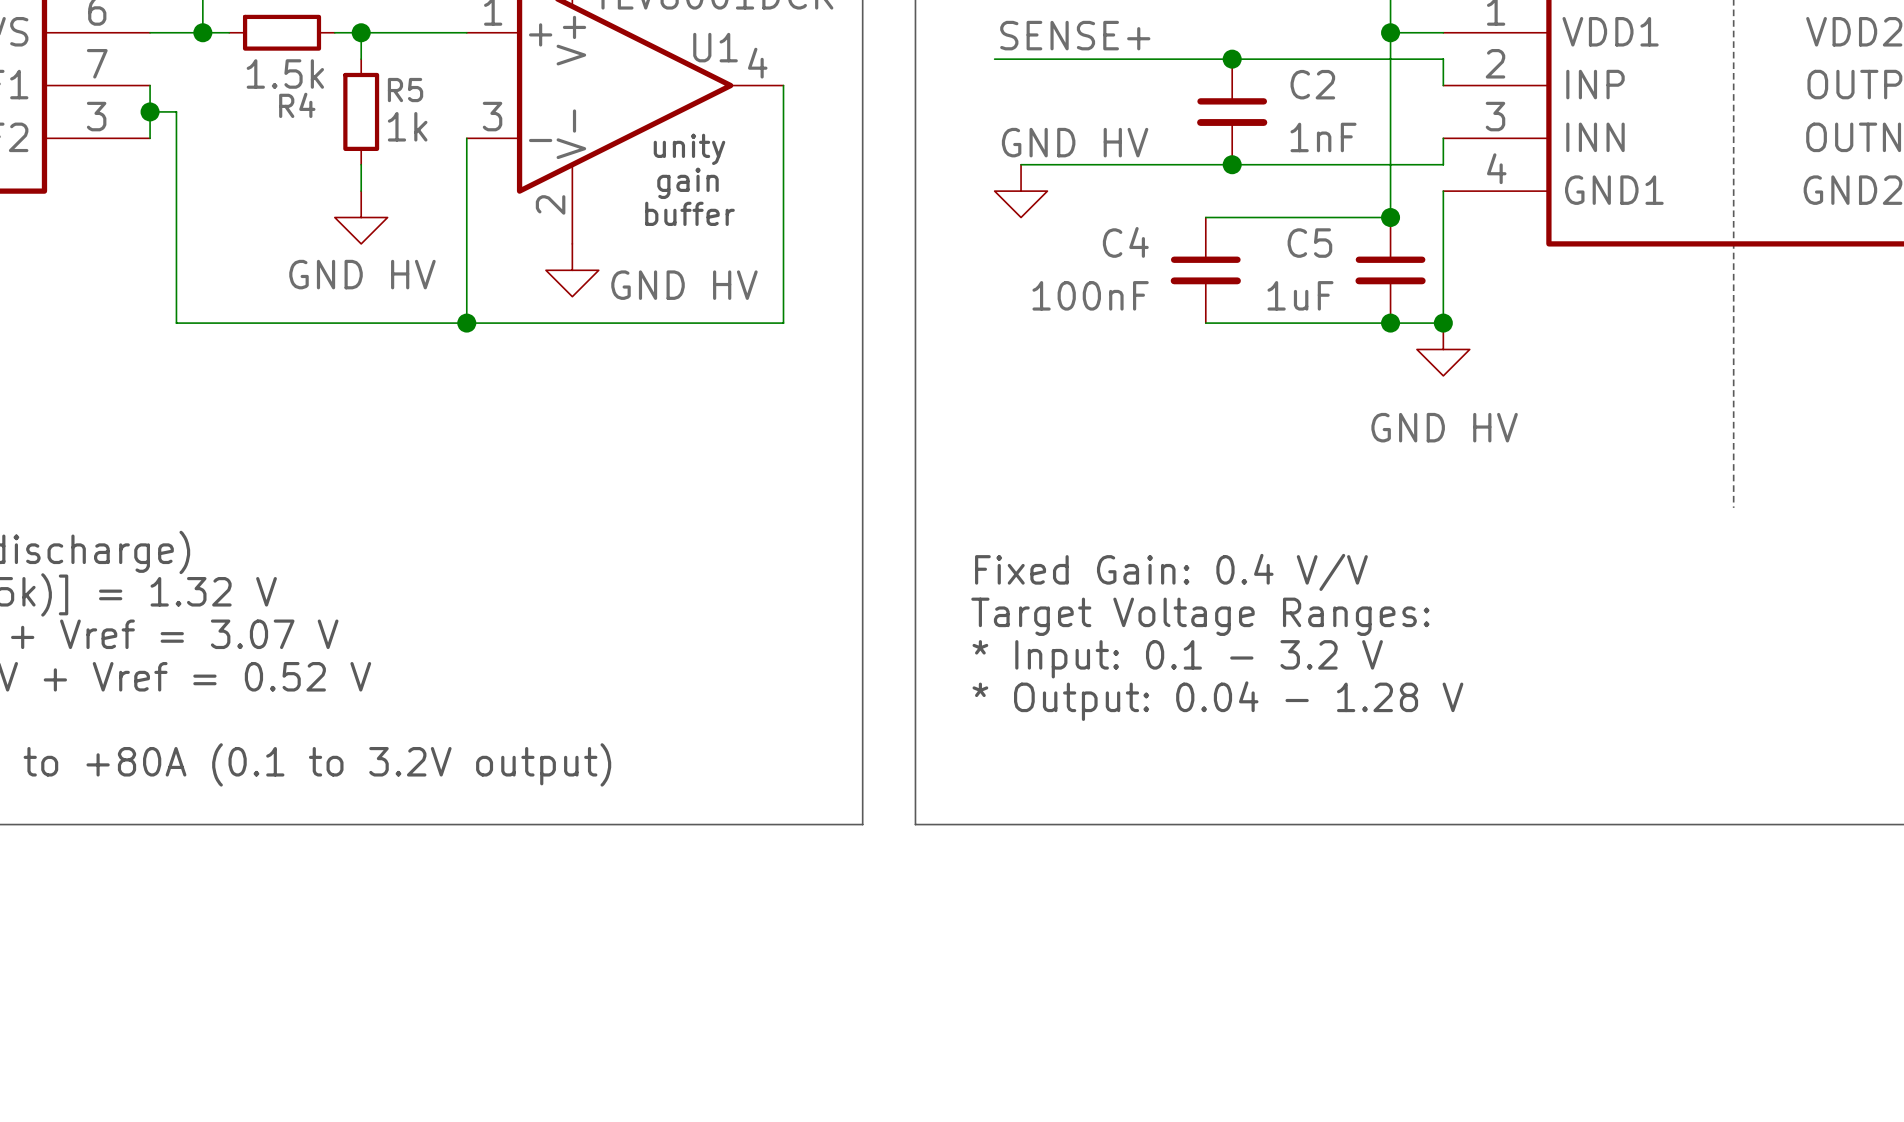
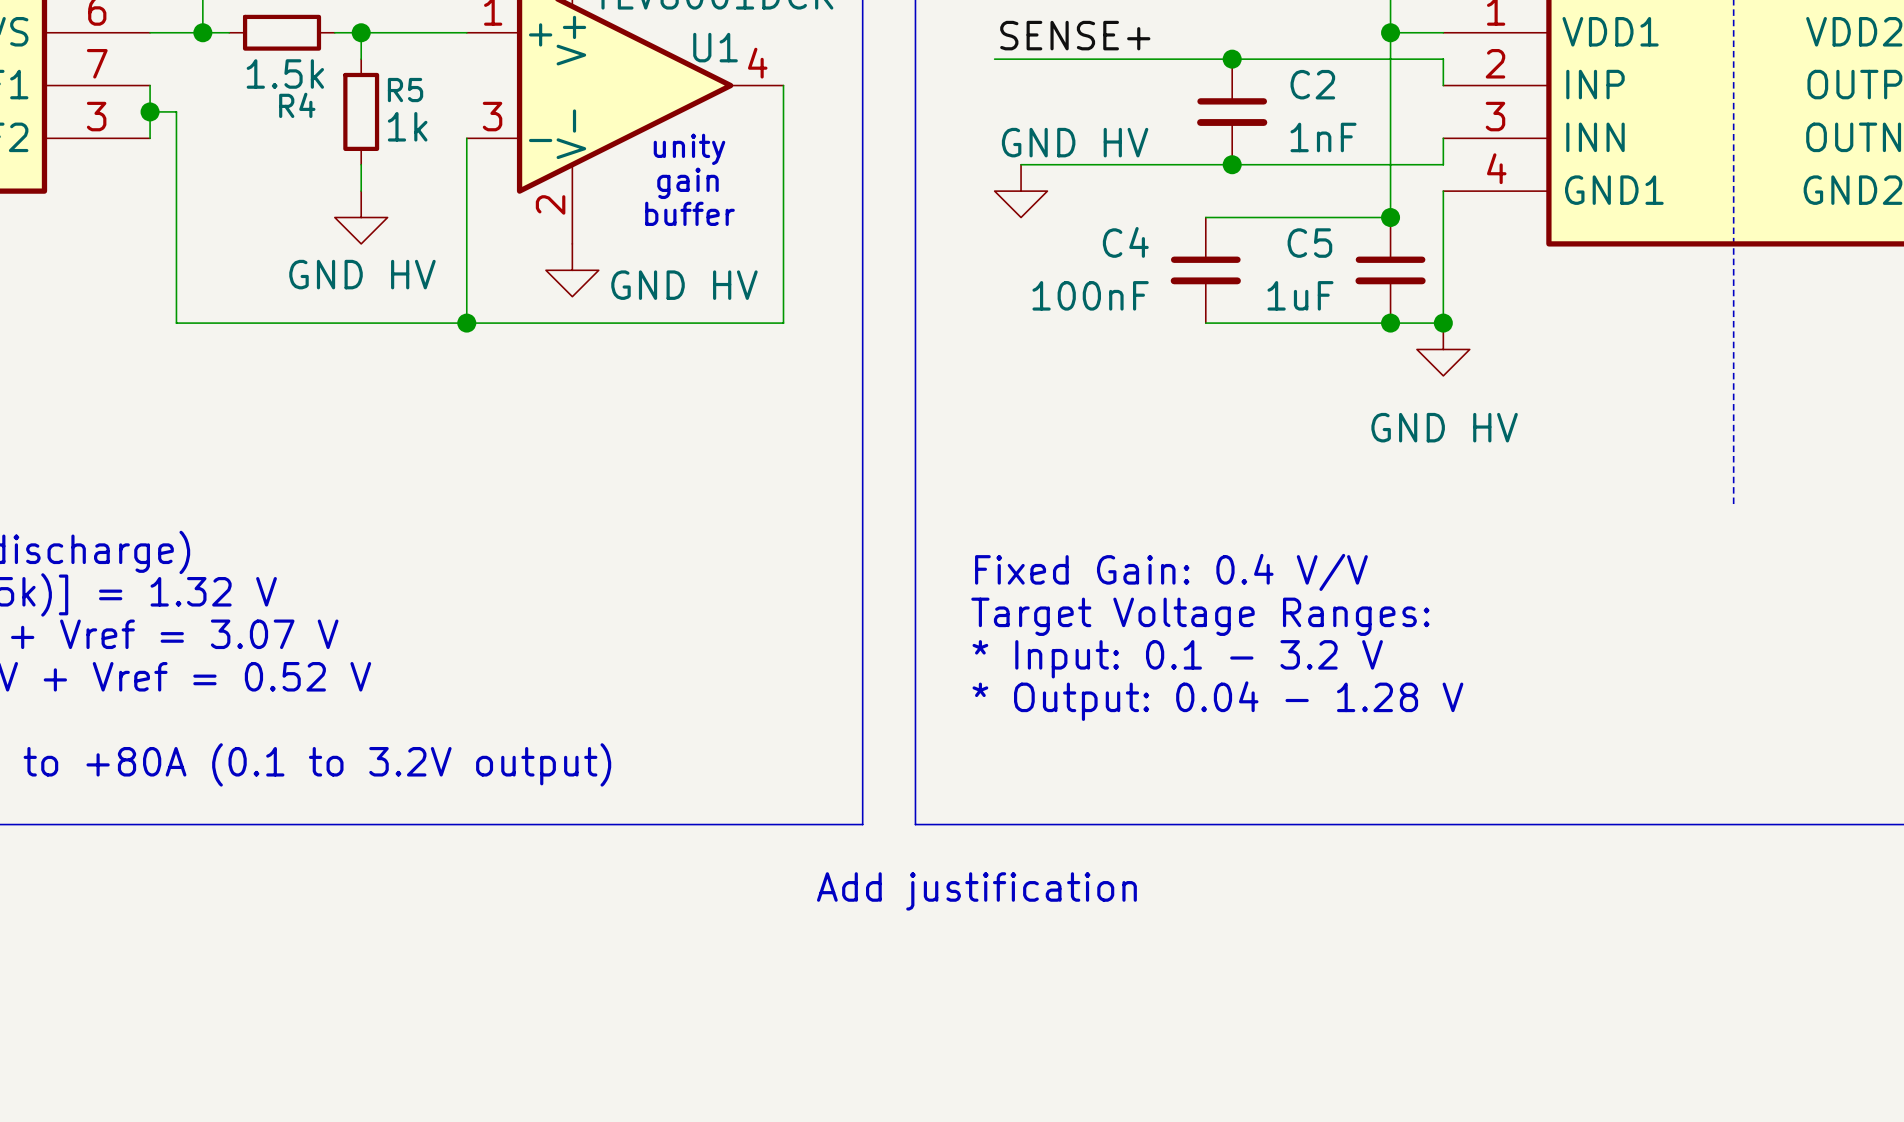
text: none -> Add justification (976, 891)

